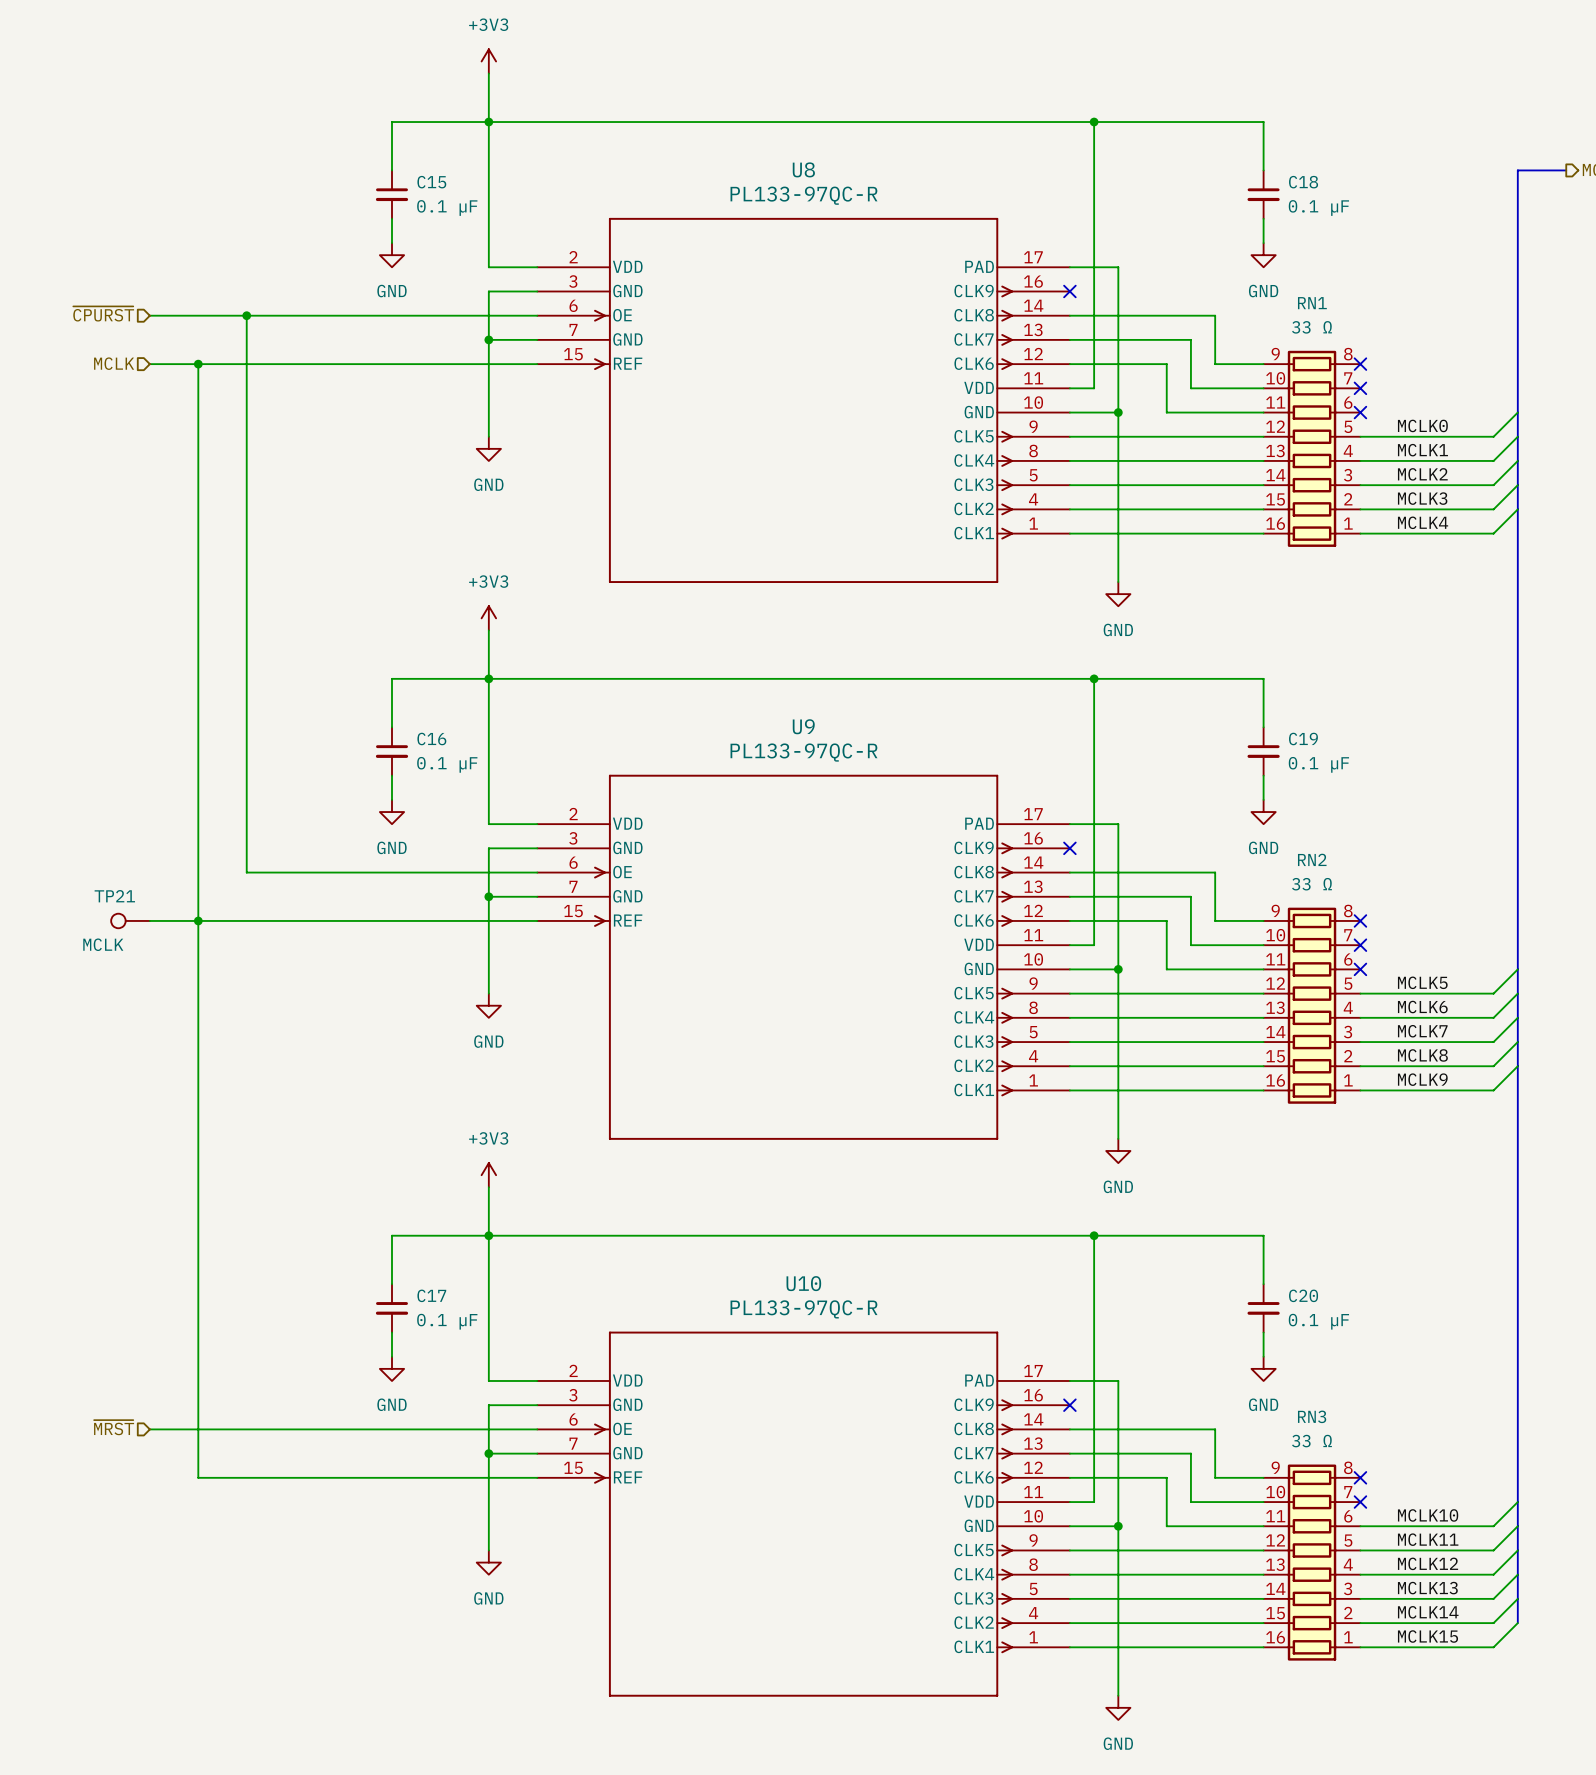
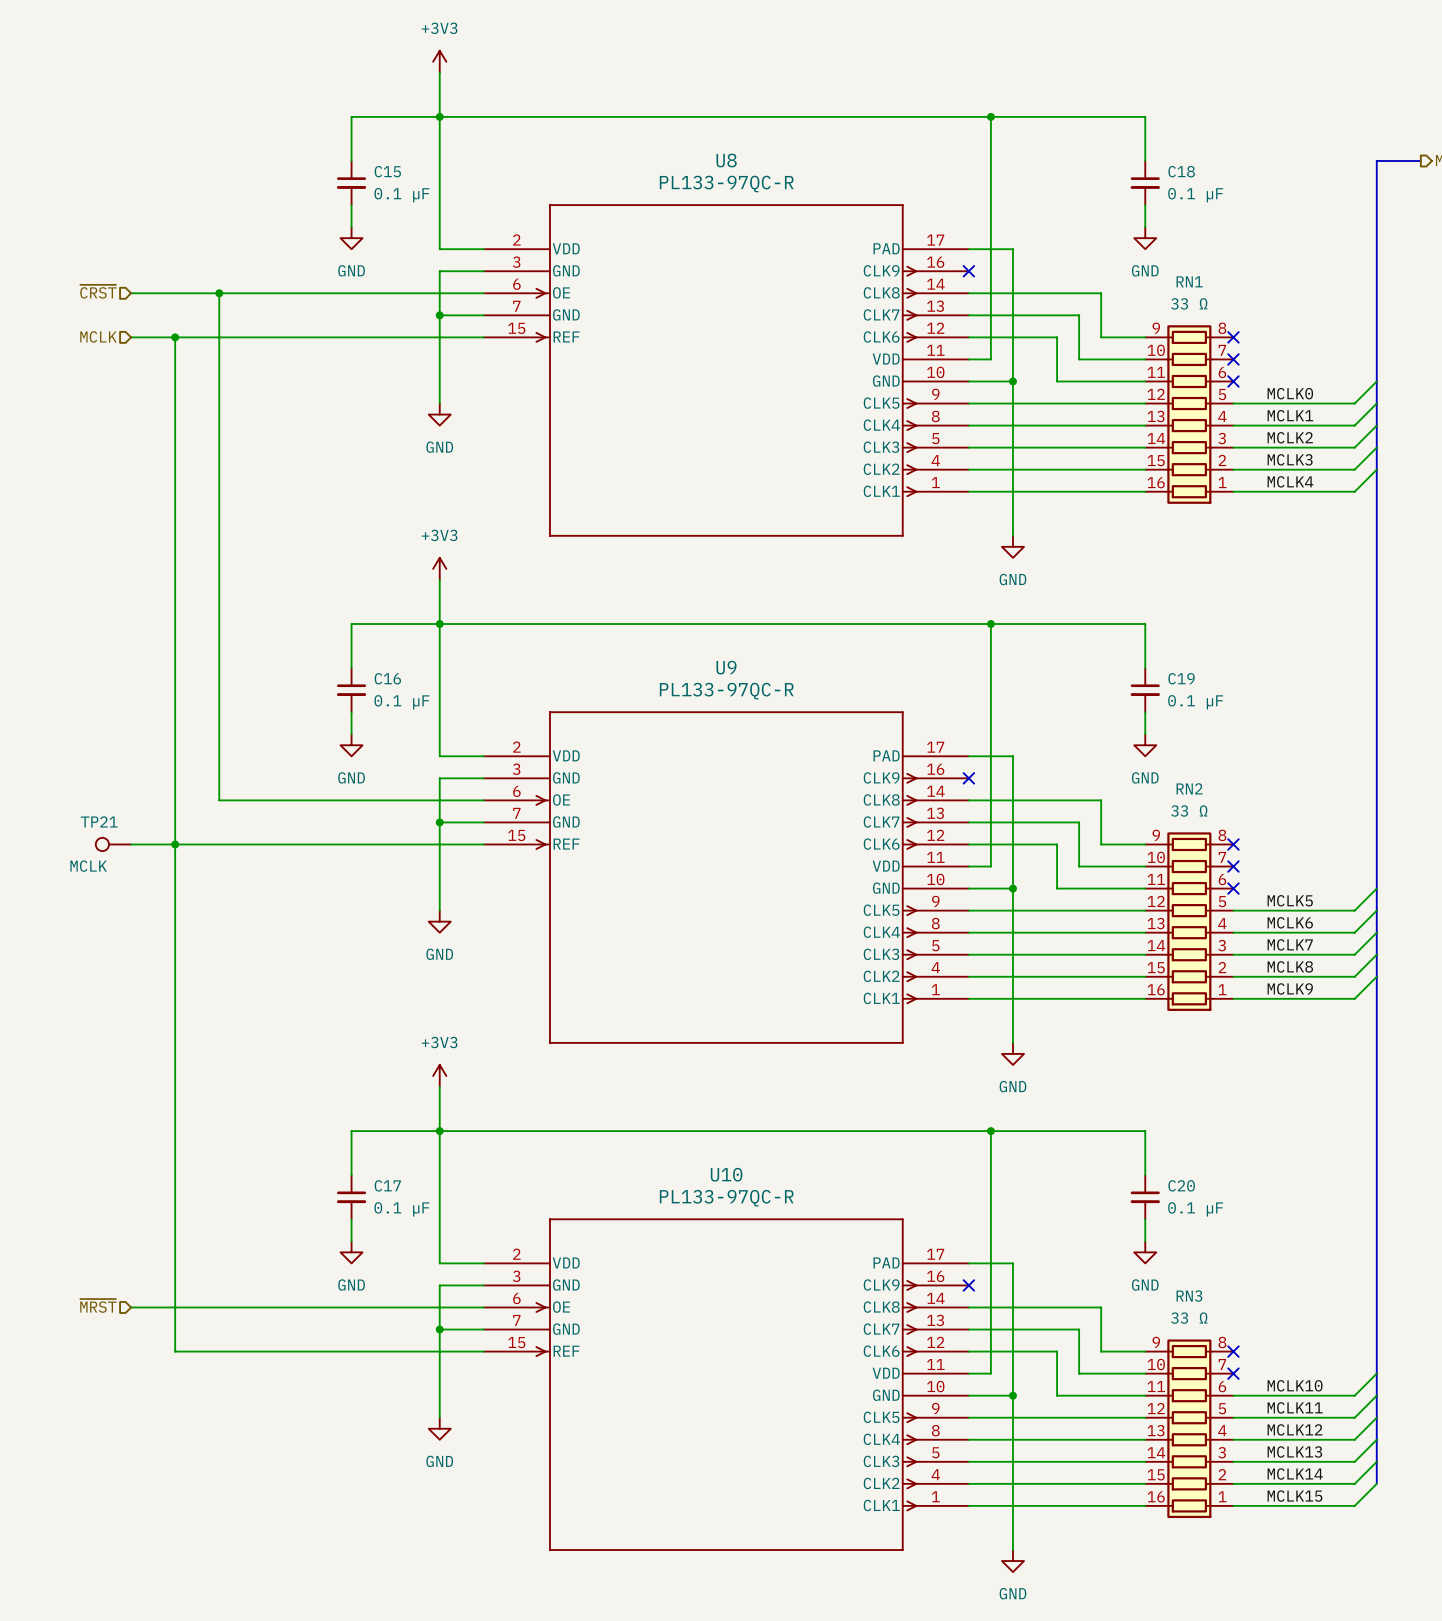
hierarchical label: ~{CPURST} (103, 313) -> ~{CRST} (98, 291)

